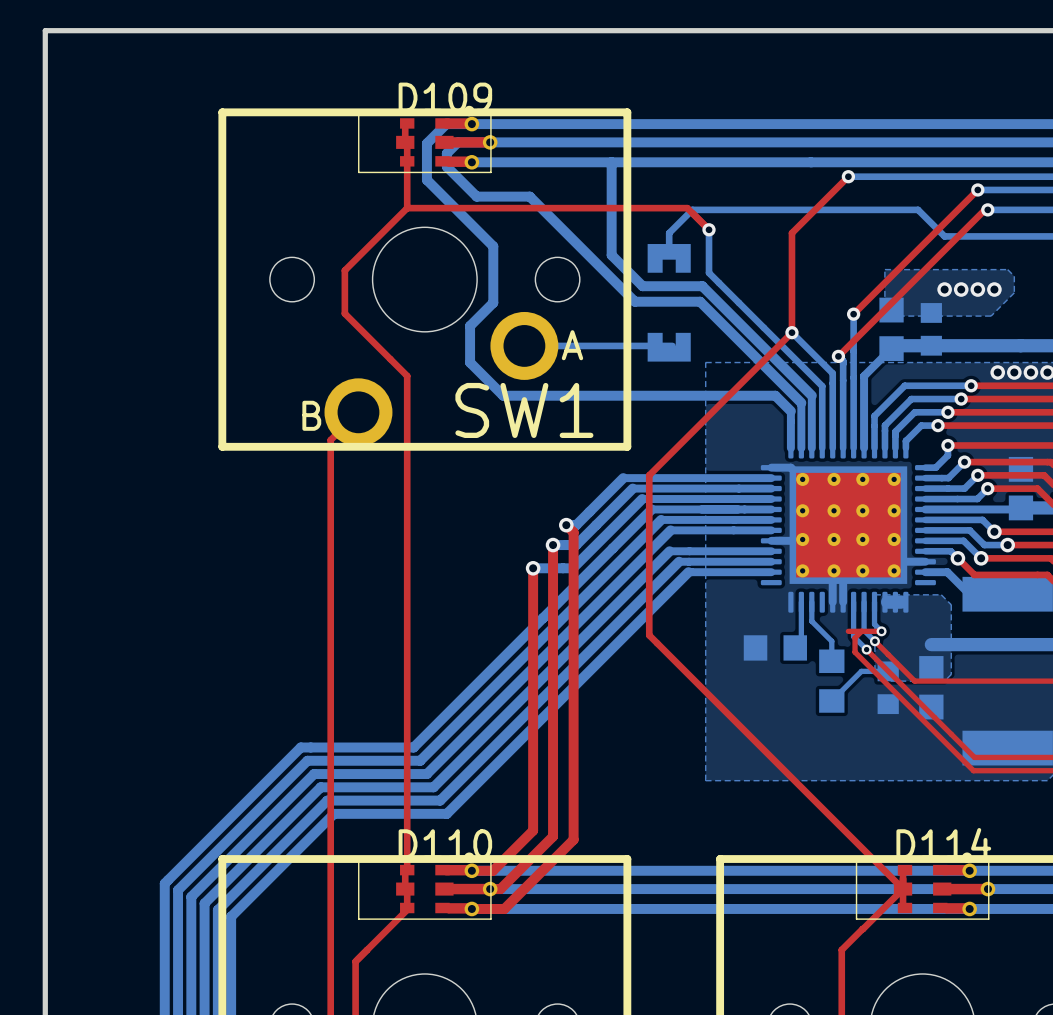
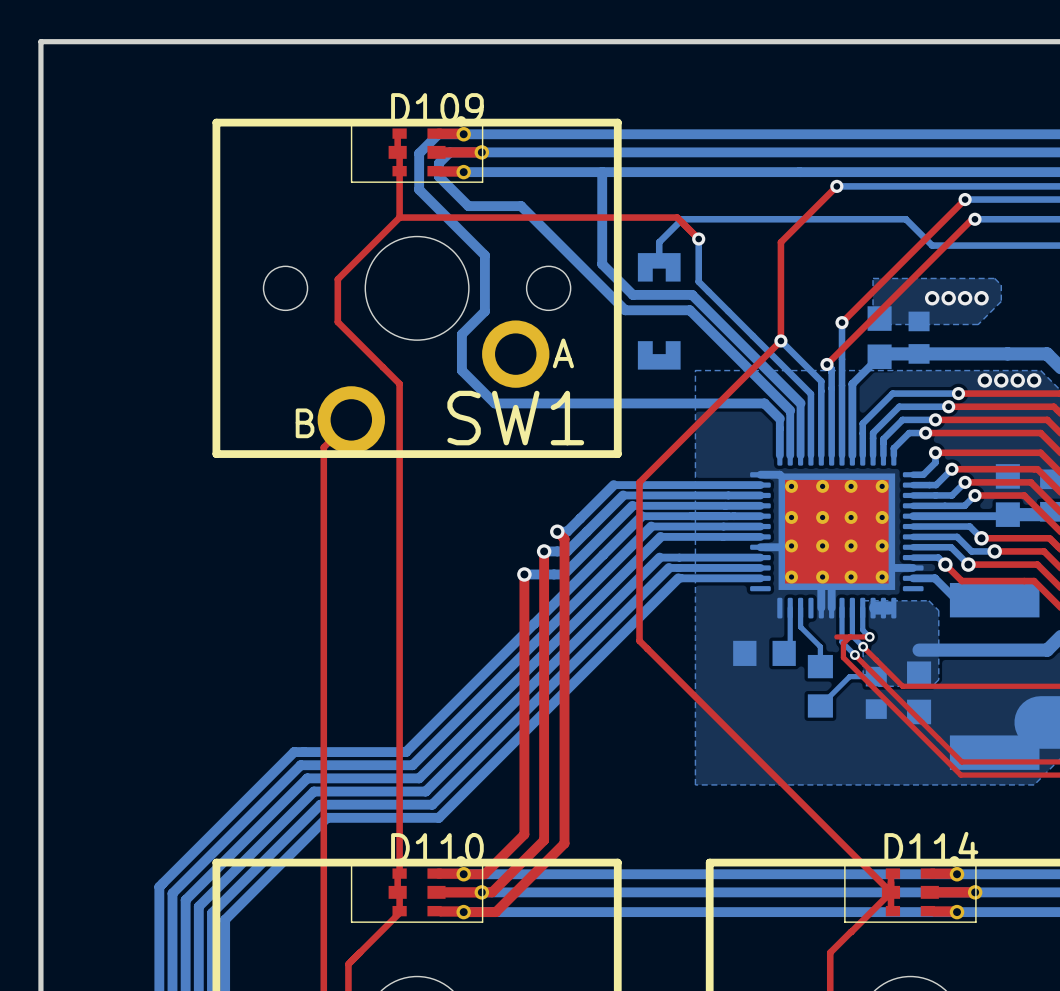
bottom track: (524, 345) (672, 345) -> none

